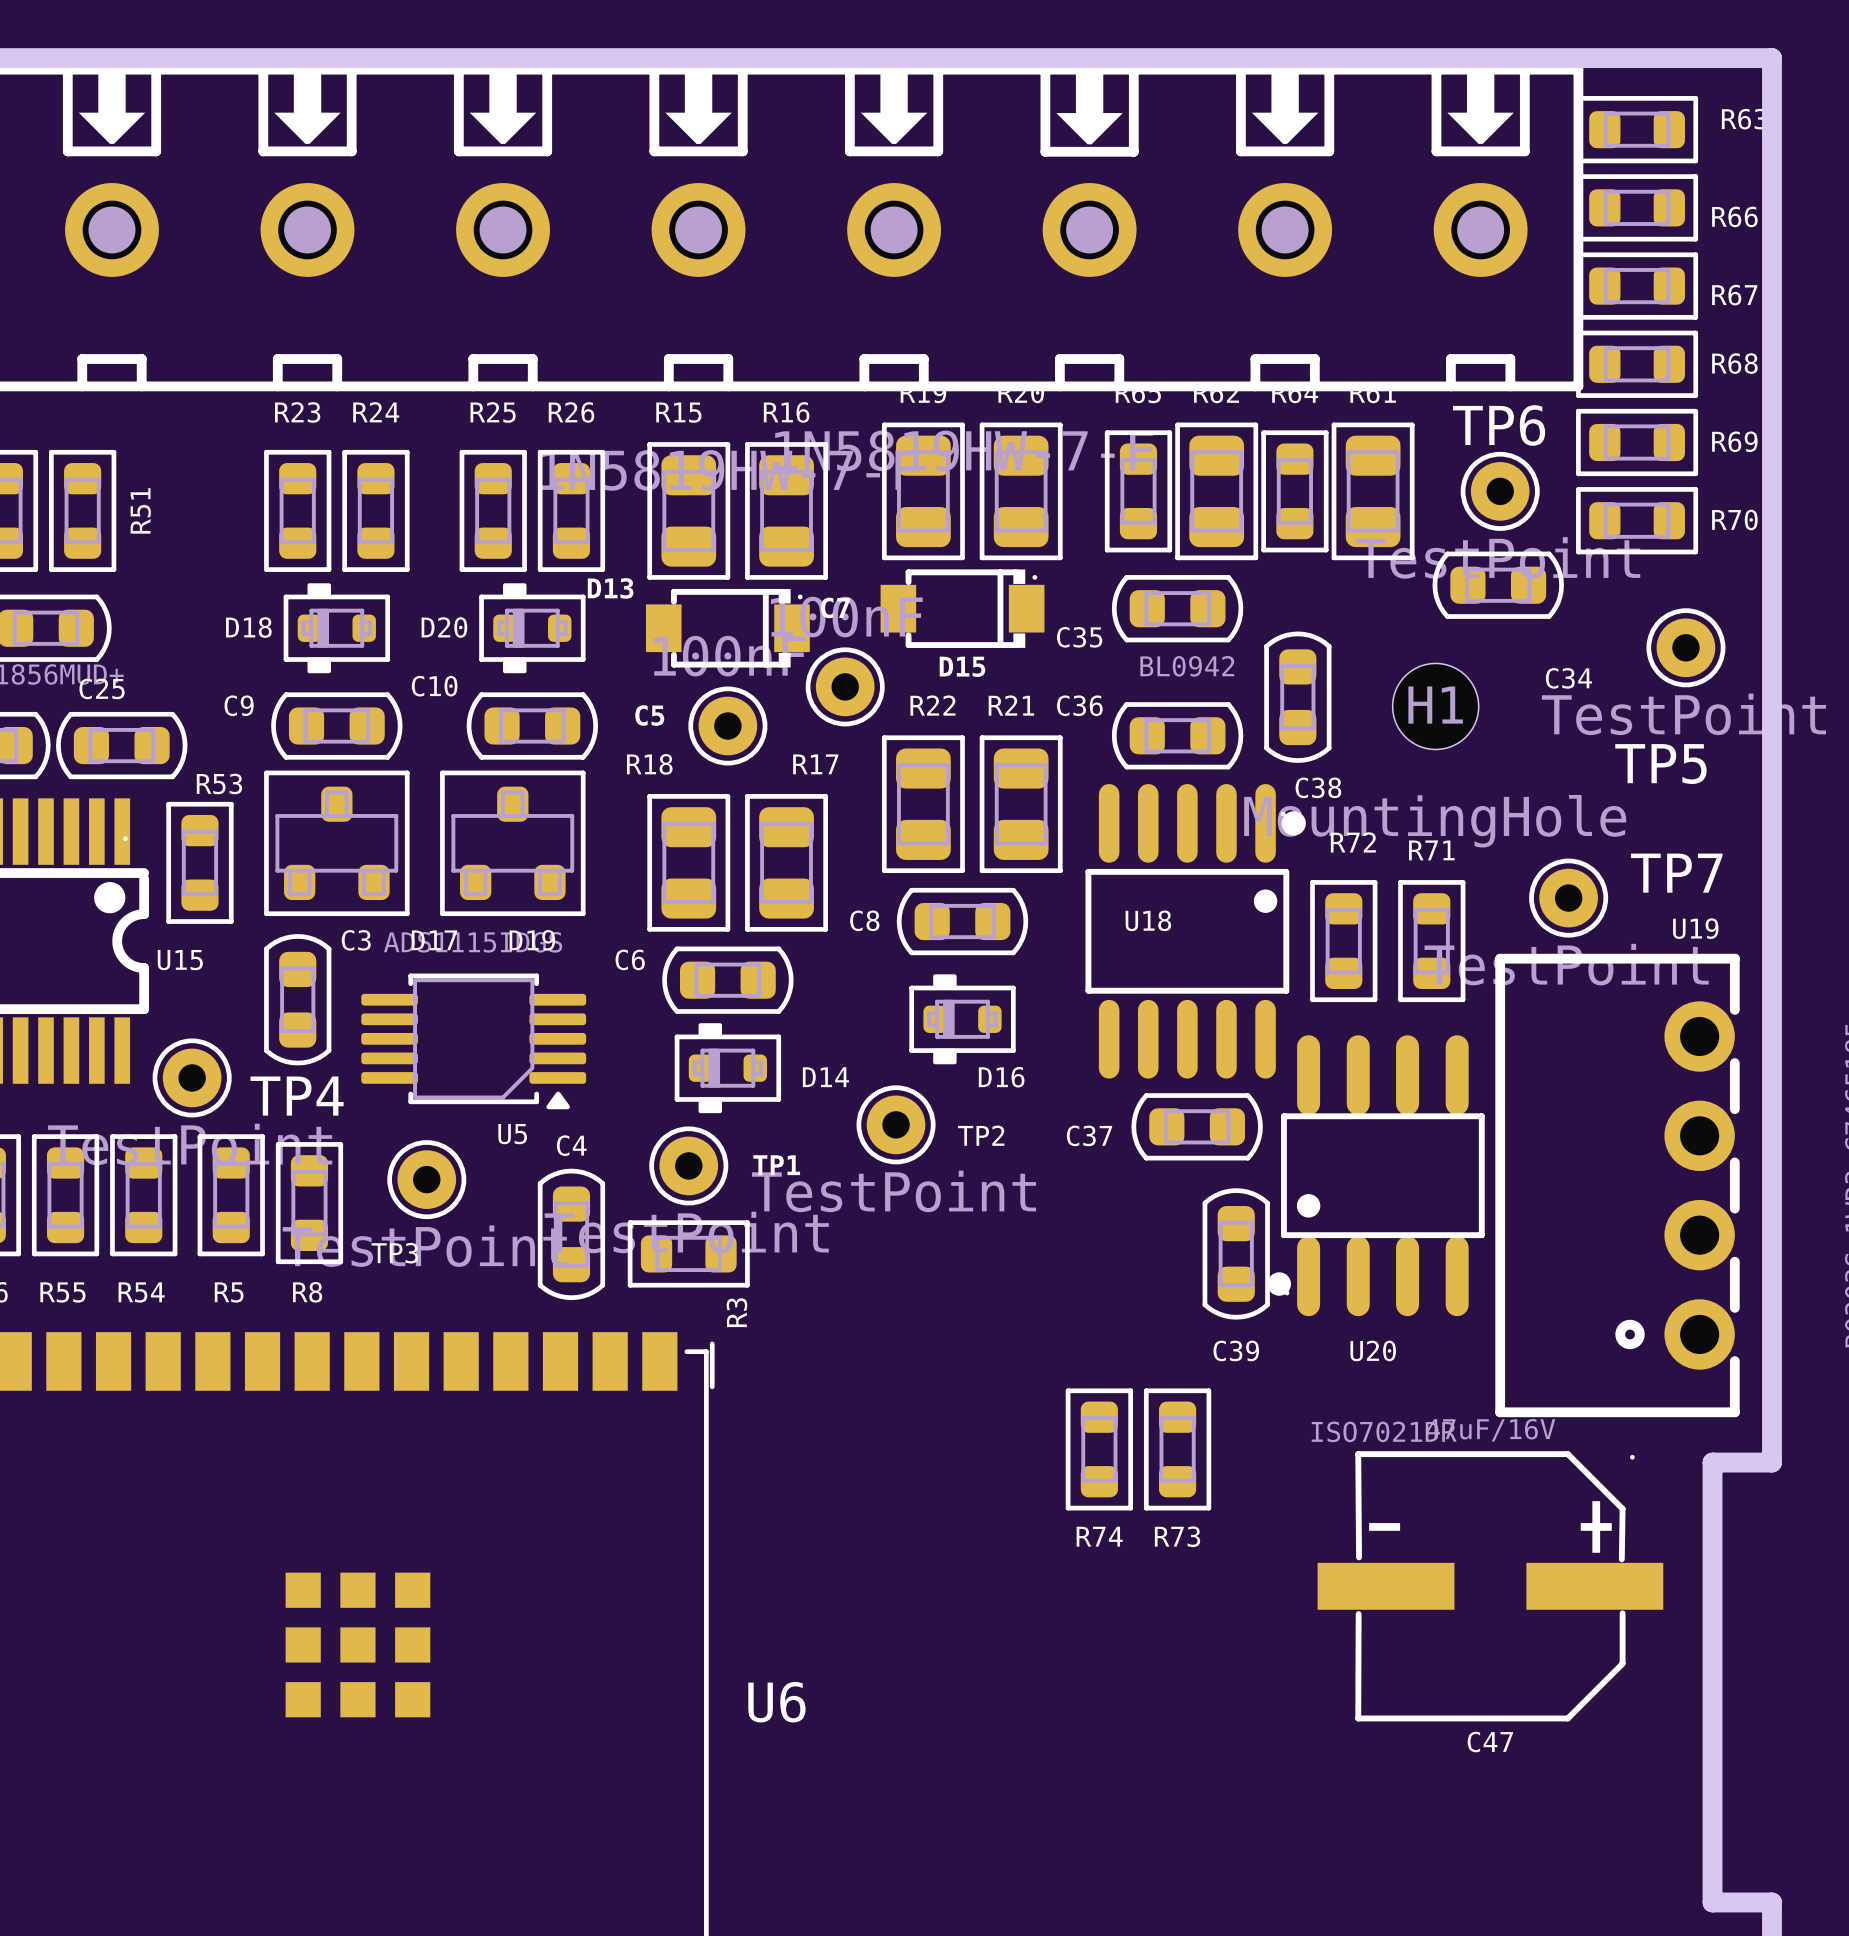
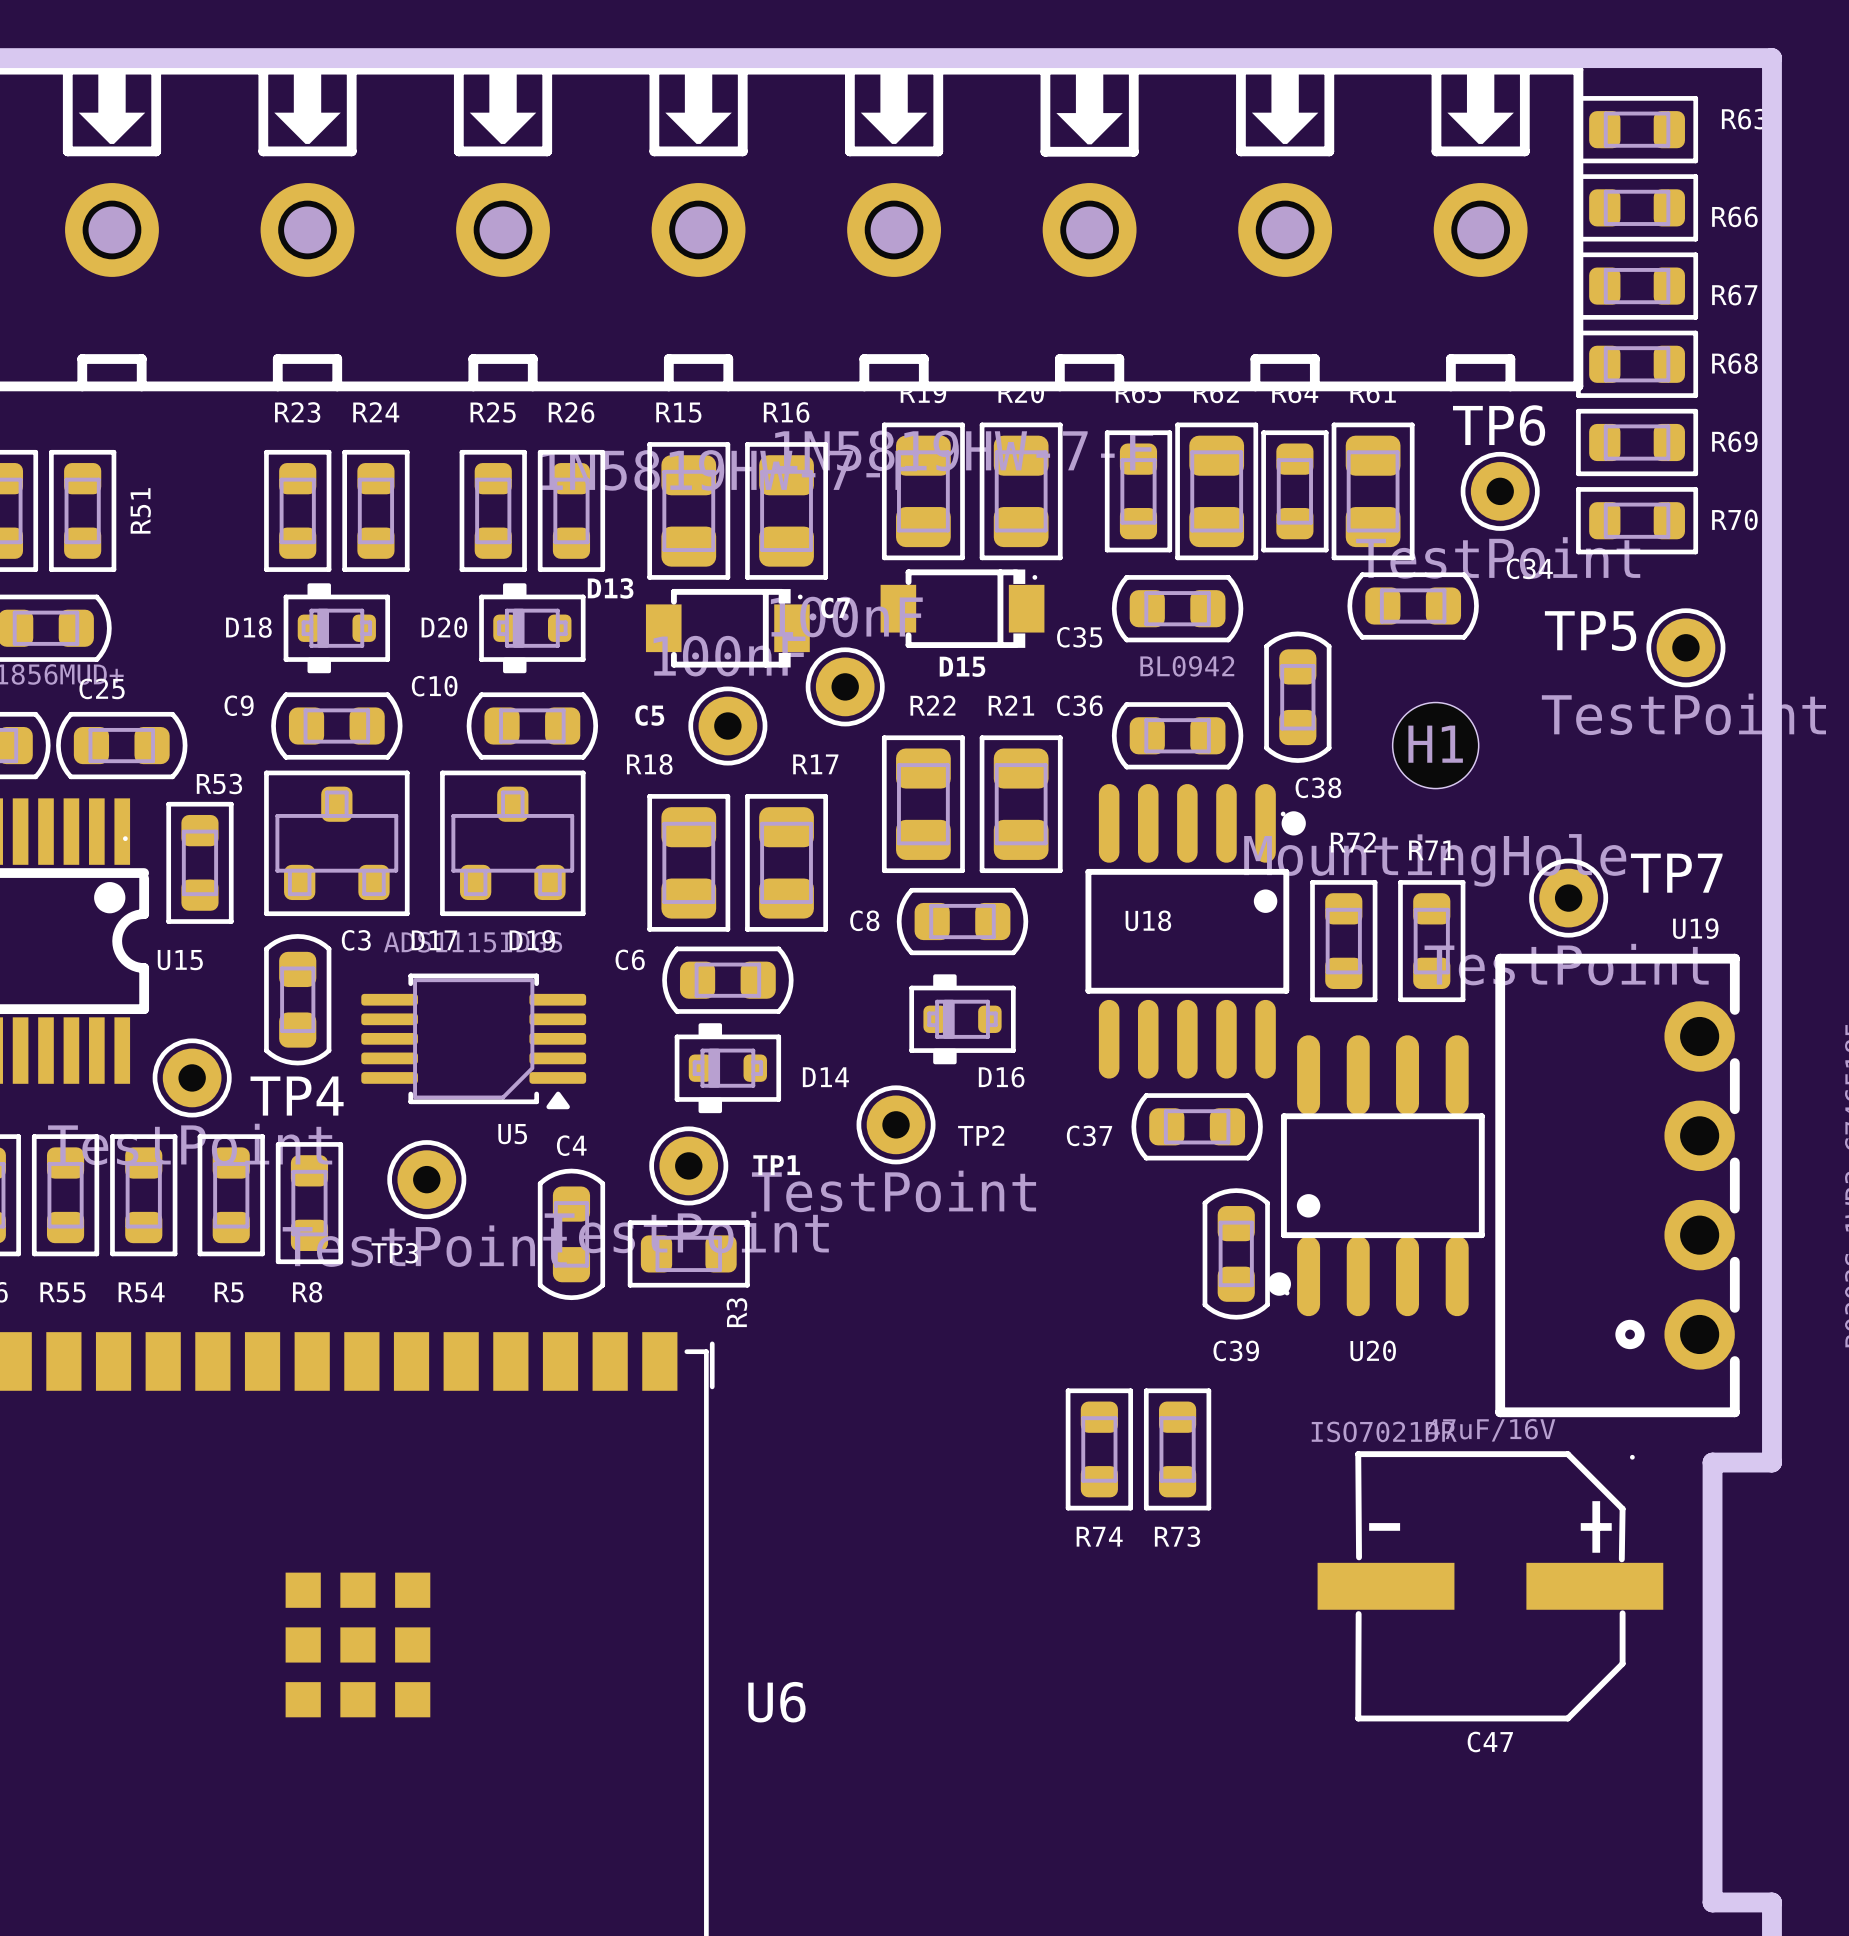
C34 position: (1498, 585) -> (1413, 606)
C34 name position: C34 (1568, 678) -> C34 (1529, 568)
H1 position: (1435, 706) -> (1435, 745)
TP5 name position: TP5 (1660, 764) -> TP5 (1590, 631)

